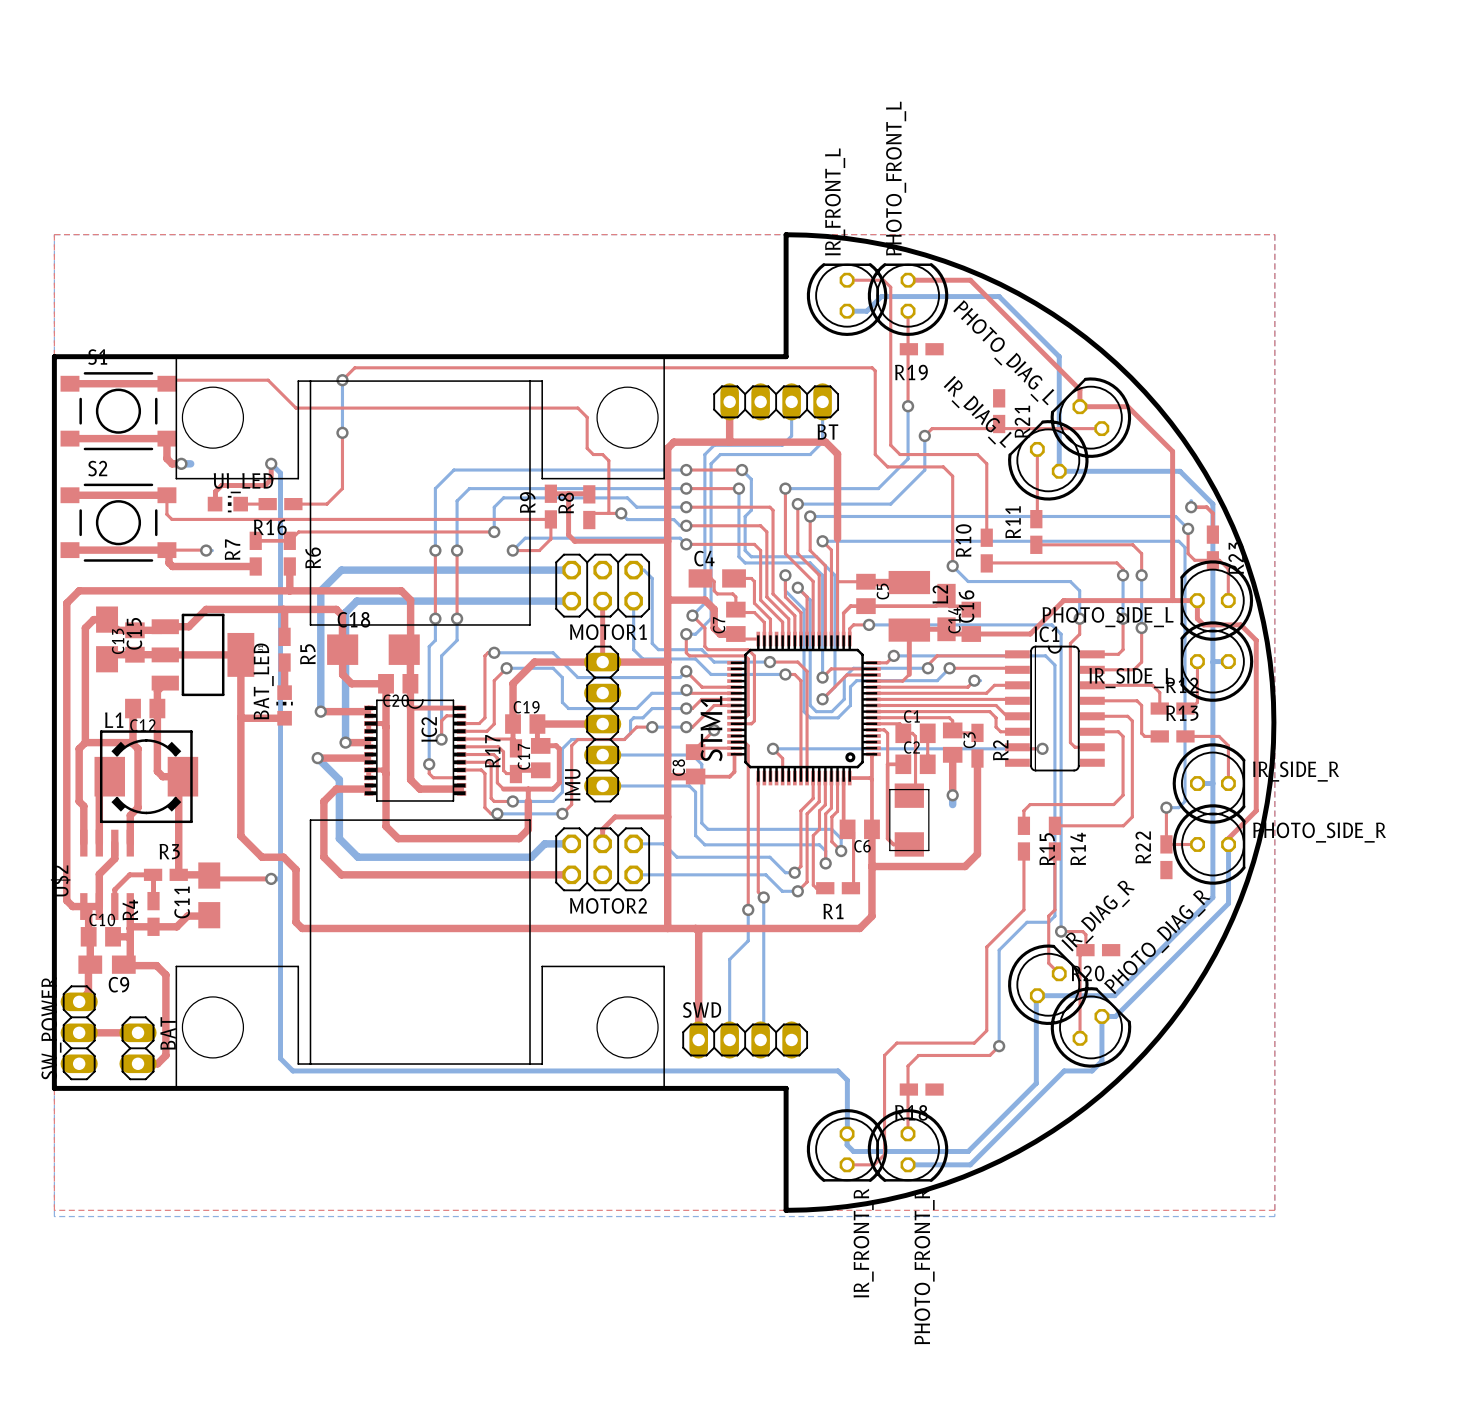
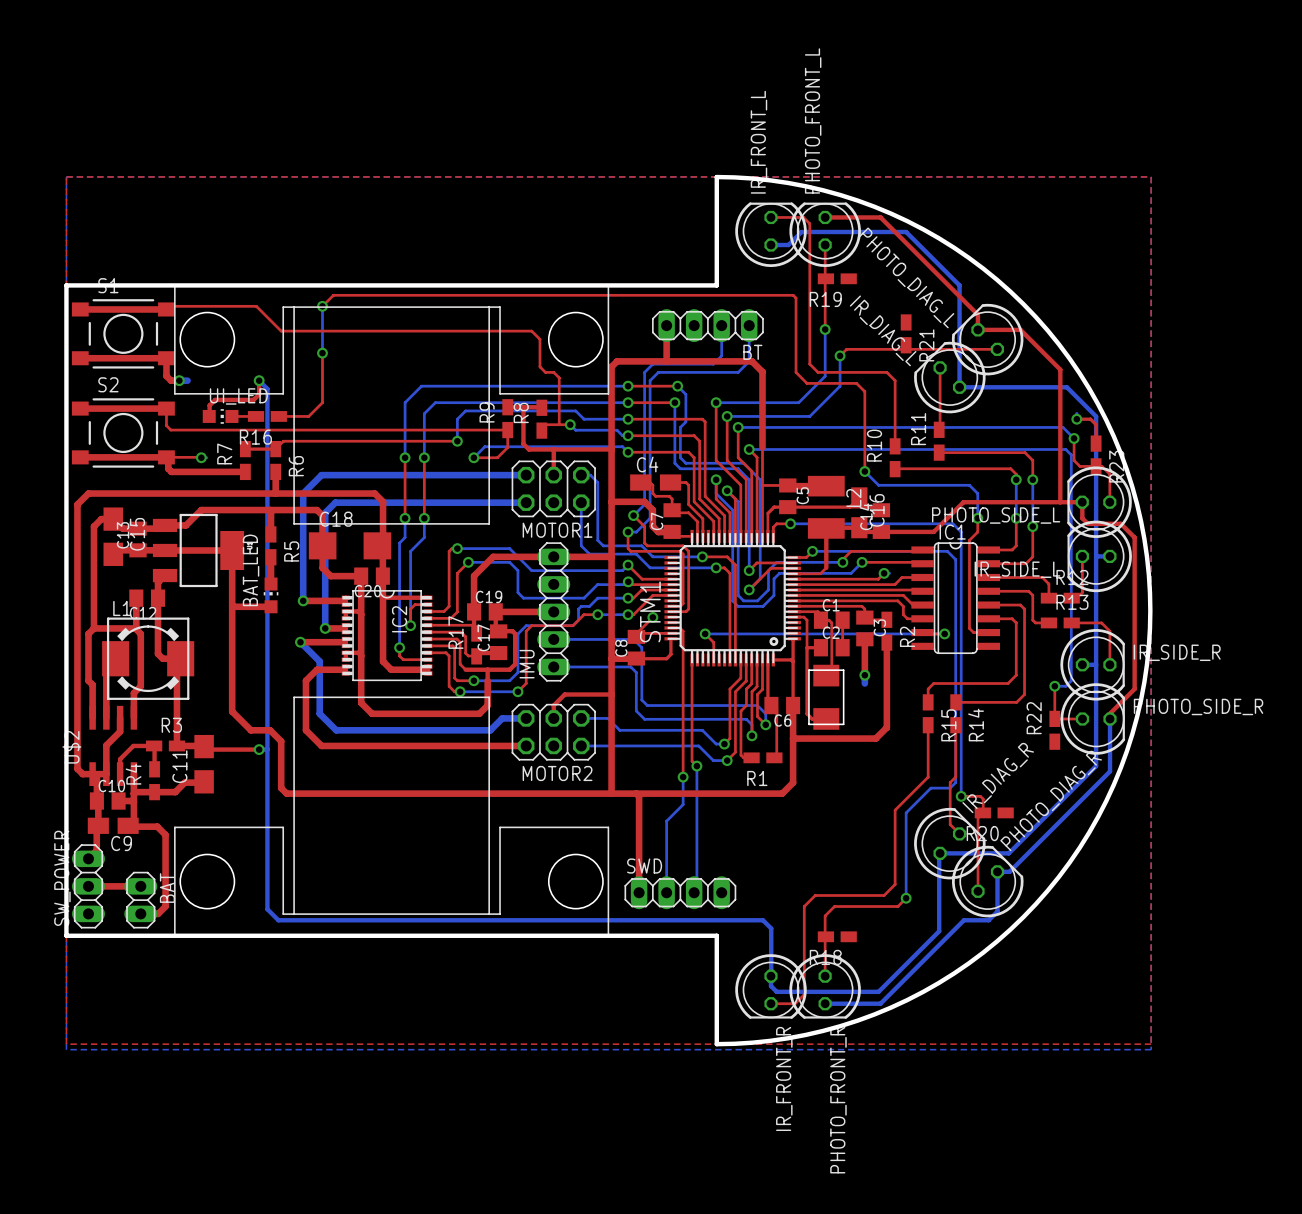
top track: none -> (553, 449) (553, 475)
top track: (602, 601) (602, 662) -> none

